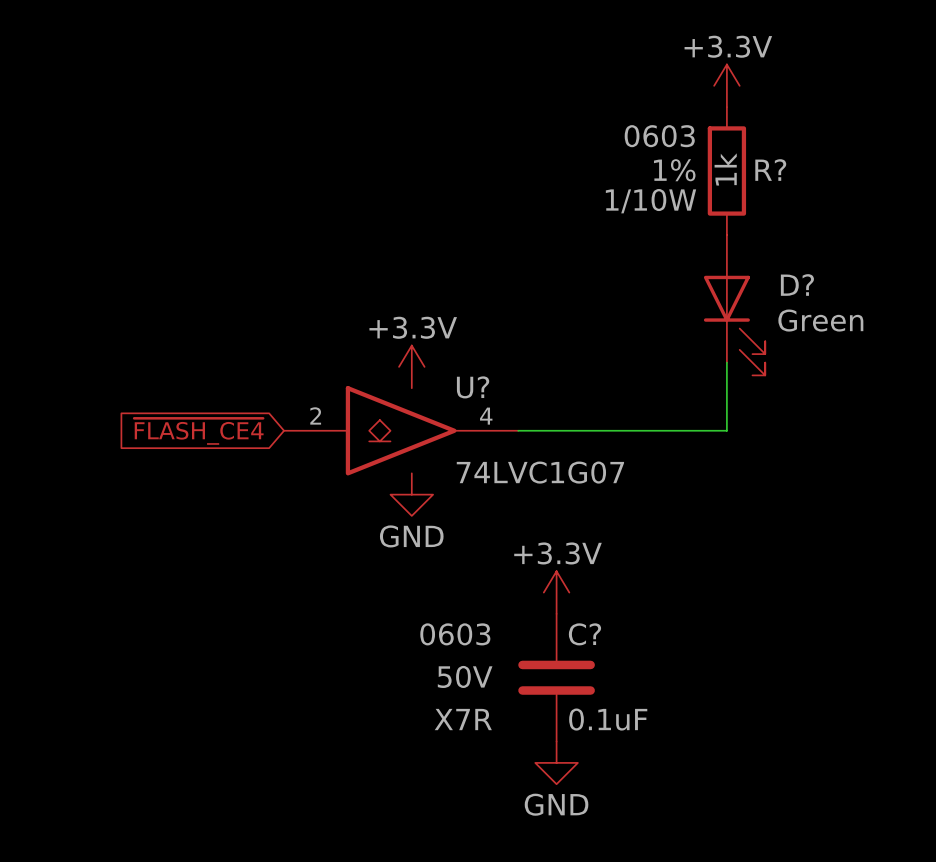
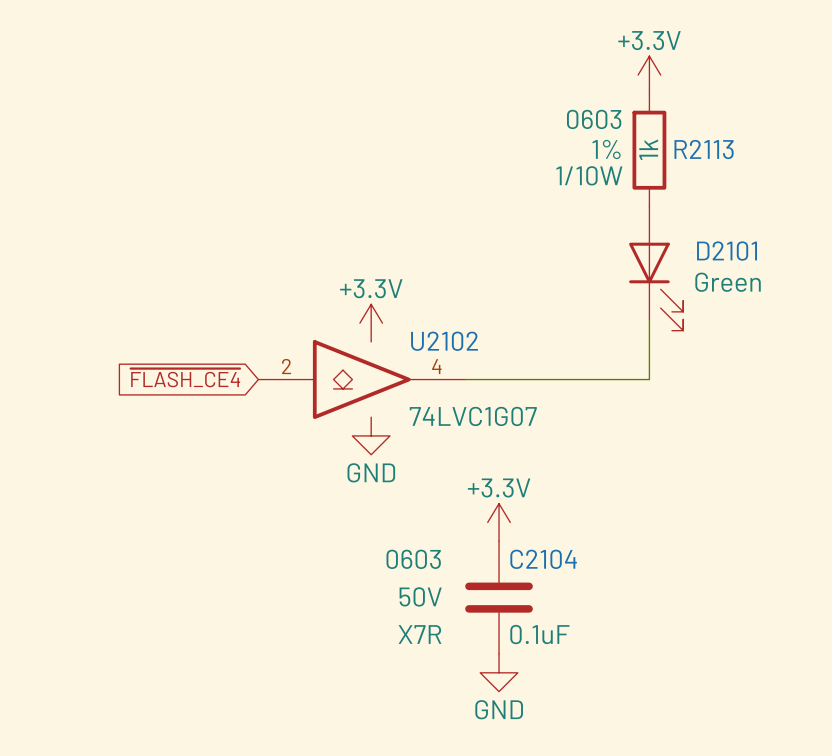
R? name: R? (770, 170) -> R2113 (704, 149)
D? name: D? (797, 284) -> D2101 (727, 251)
U? name: U? (473, 387) -> U2102 (444, 341)
C? name: C? (584, 634) -> C2104 (543, 559)

